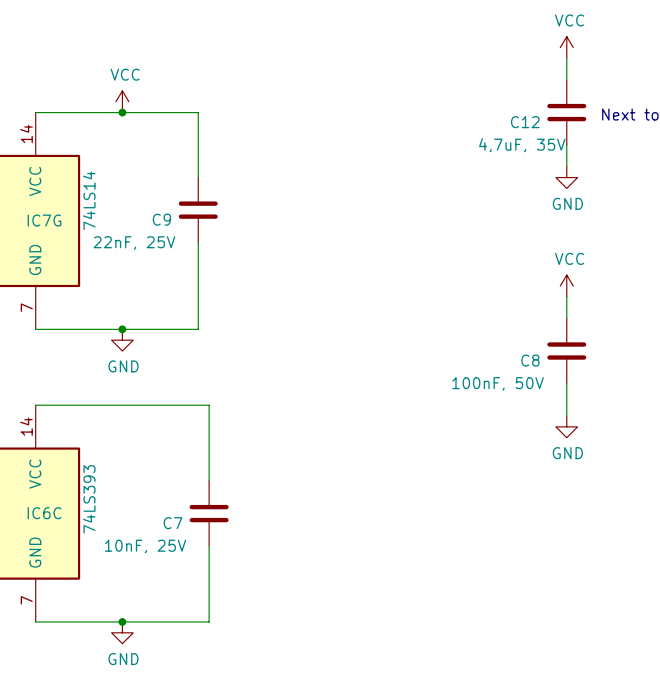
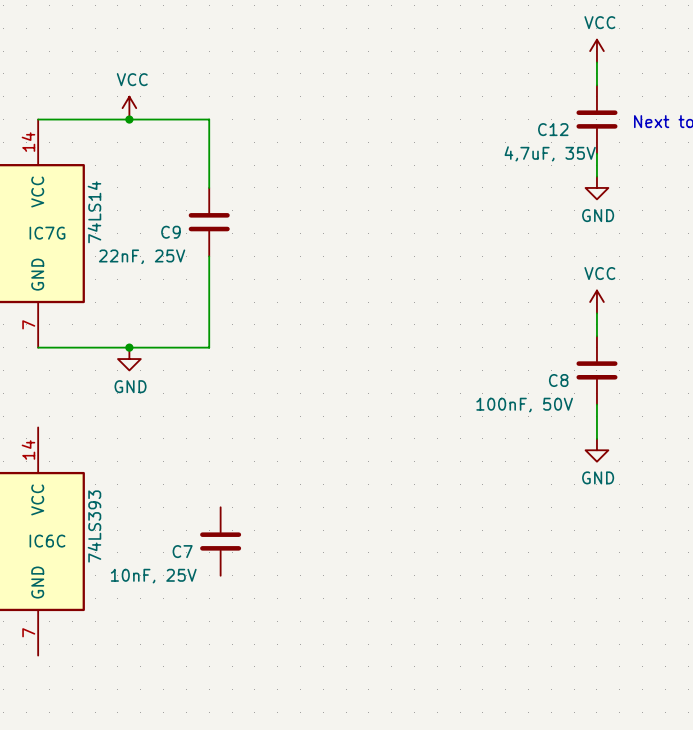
wire: (35, 405) (209, 405) (209, 481) -> none
wire: (209, 546) (209, 621) (35, 621) -> none
junction: (122, 621) -> none
power symbol: GND (122, 632) -> none

